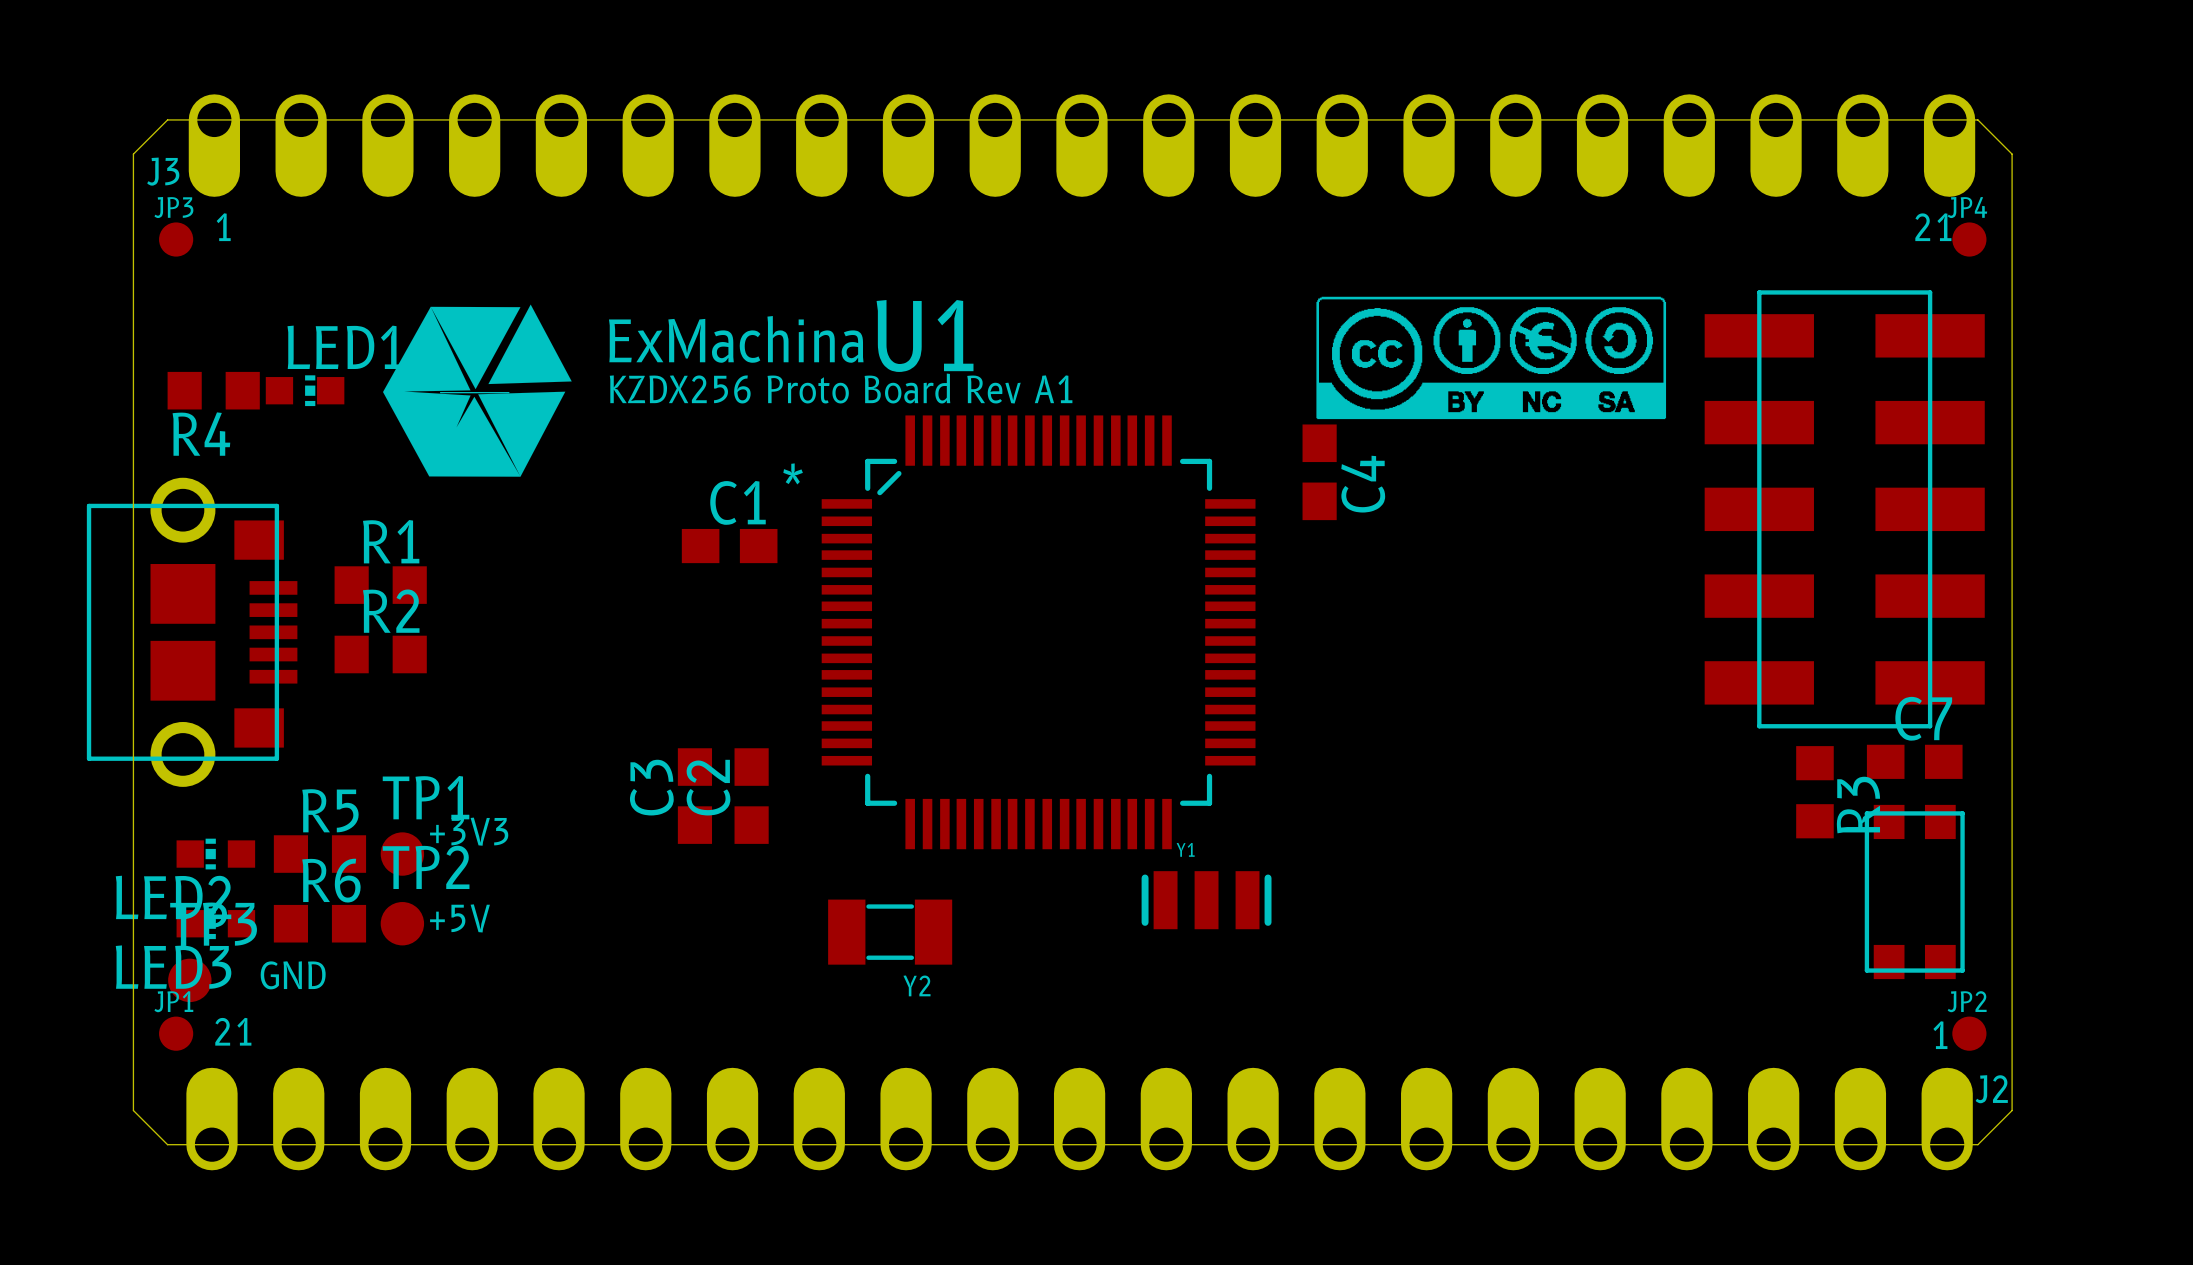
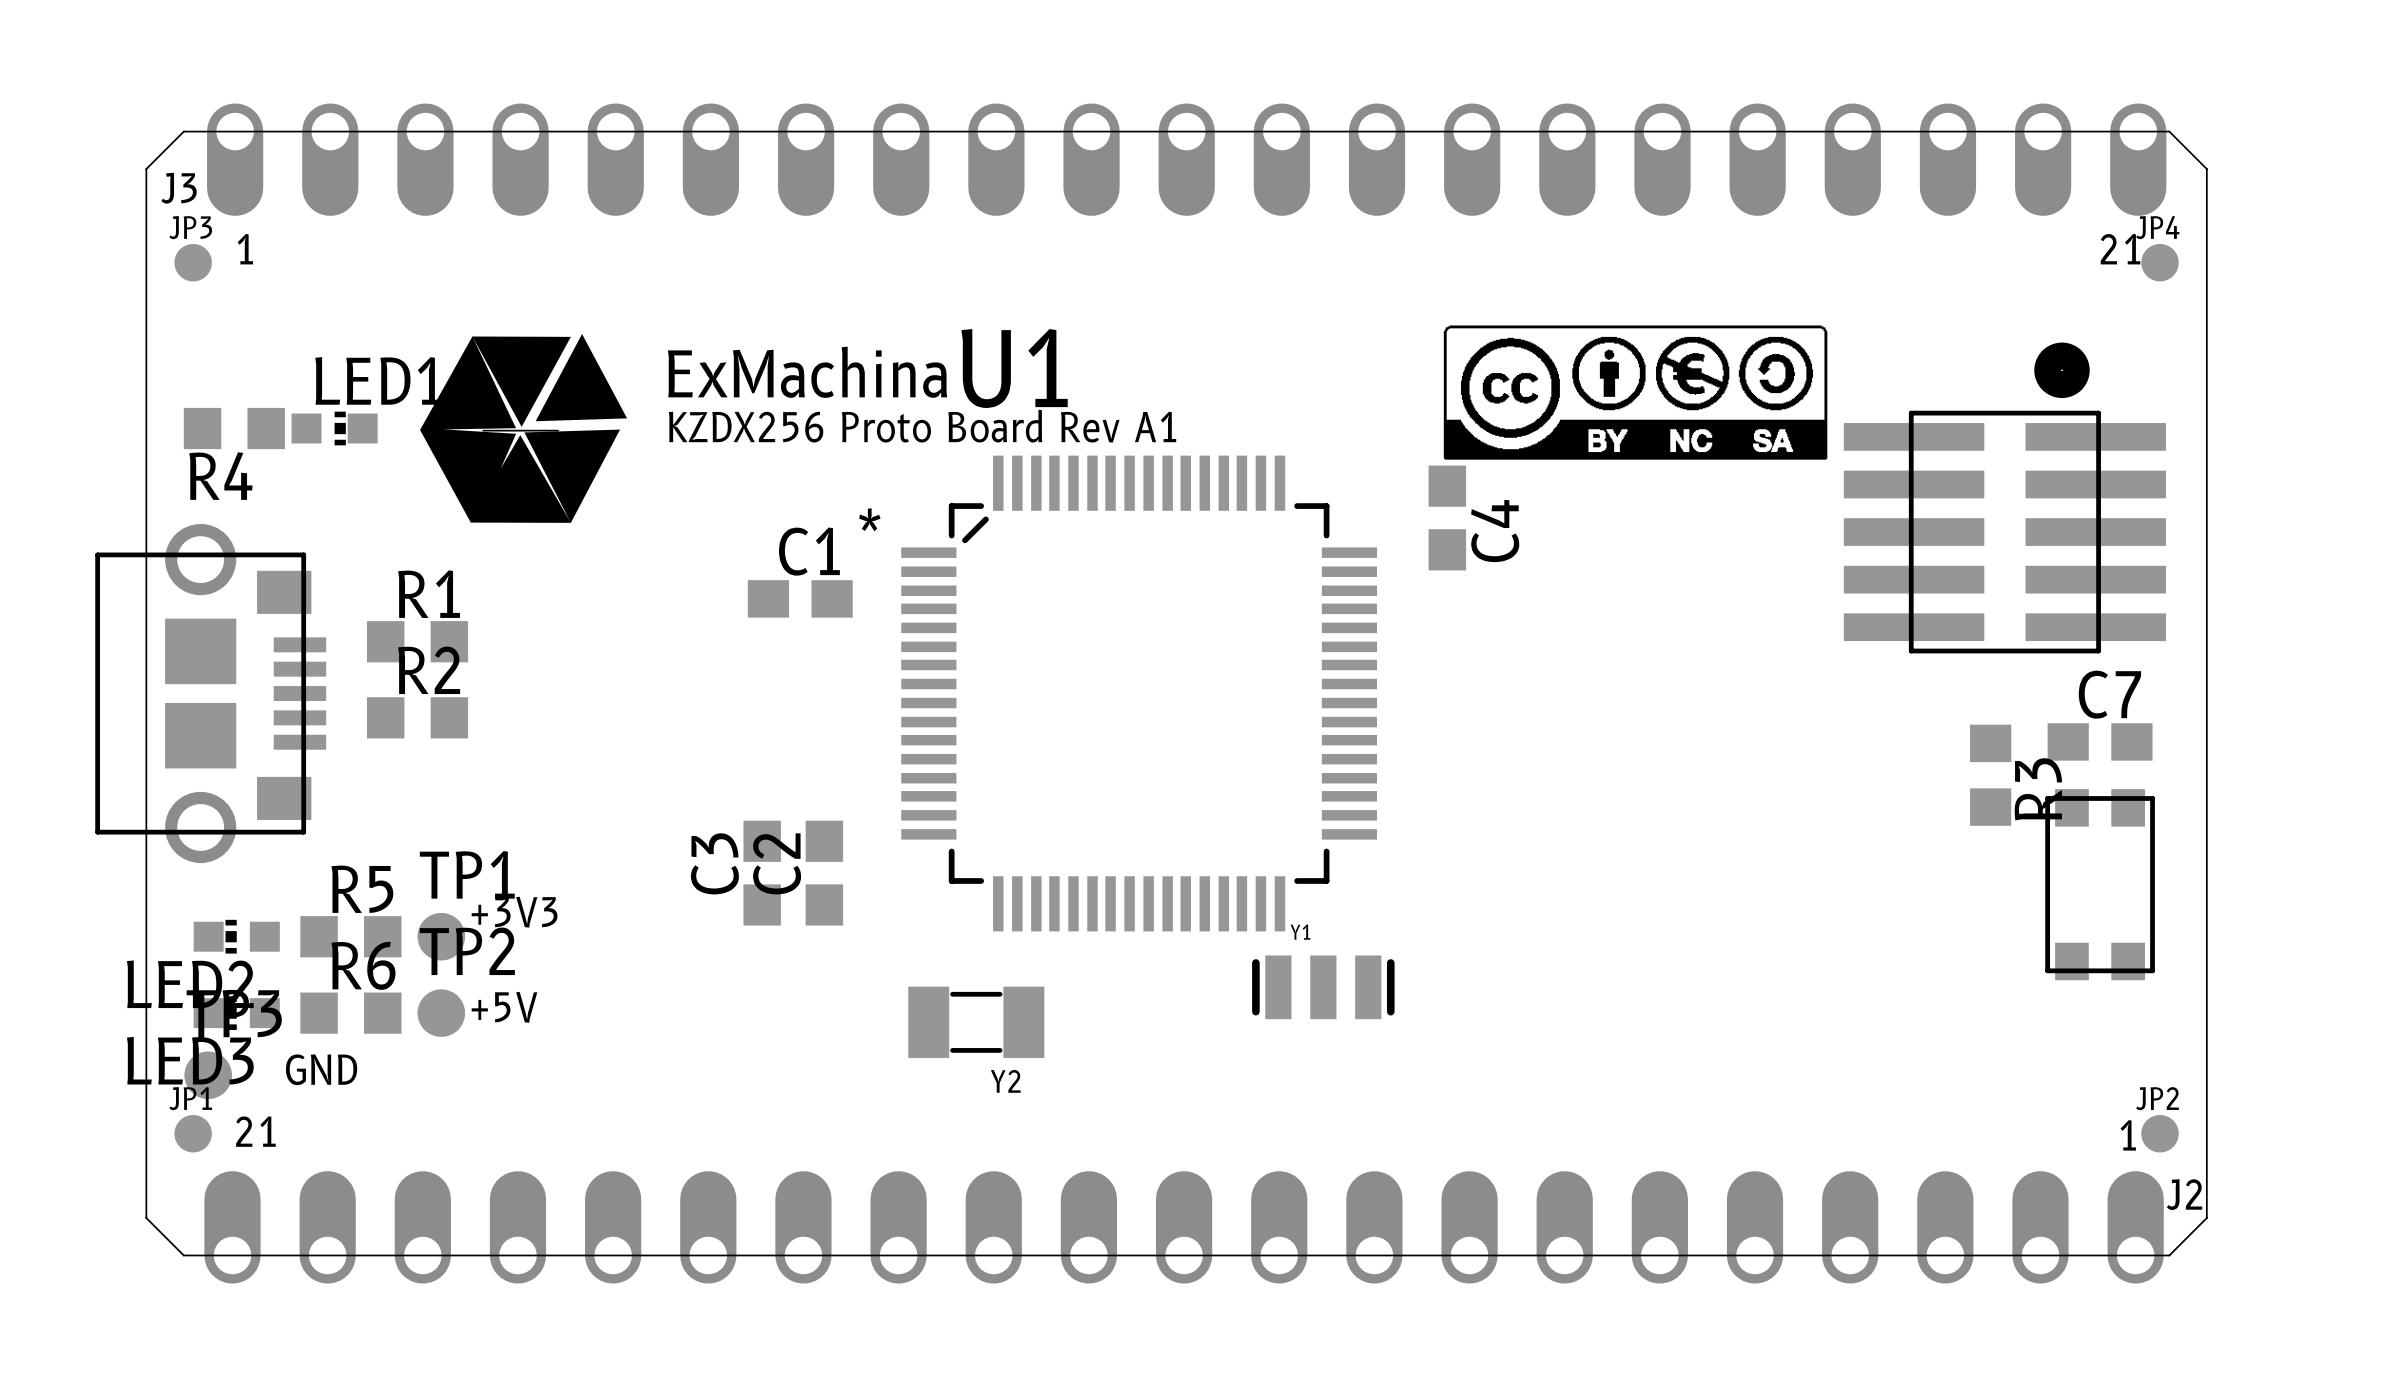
part: none -> (2004, 497)
part: (1844, 509) -> none
C7 position: (1914, 761) -> (2100, 741)
R3 position: (1814, 792) -> (1990, 775)
part position: (1914, 891) -> (2100, 884)

